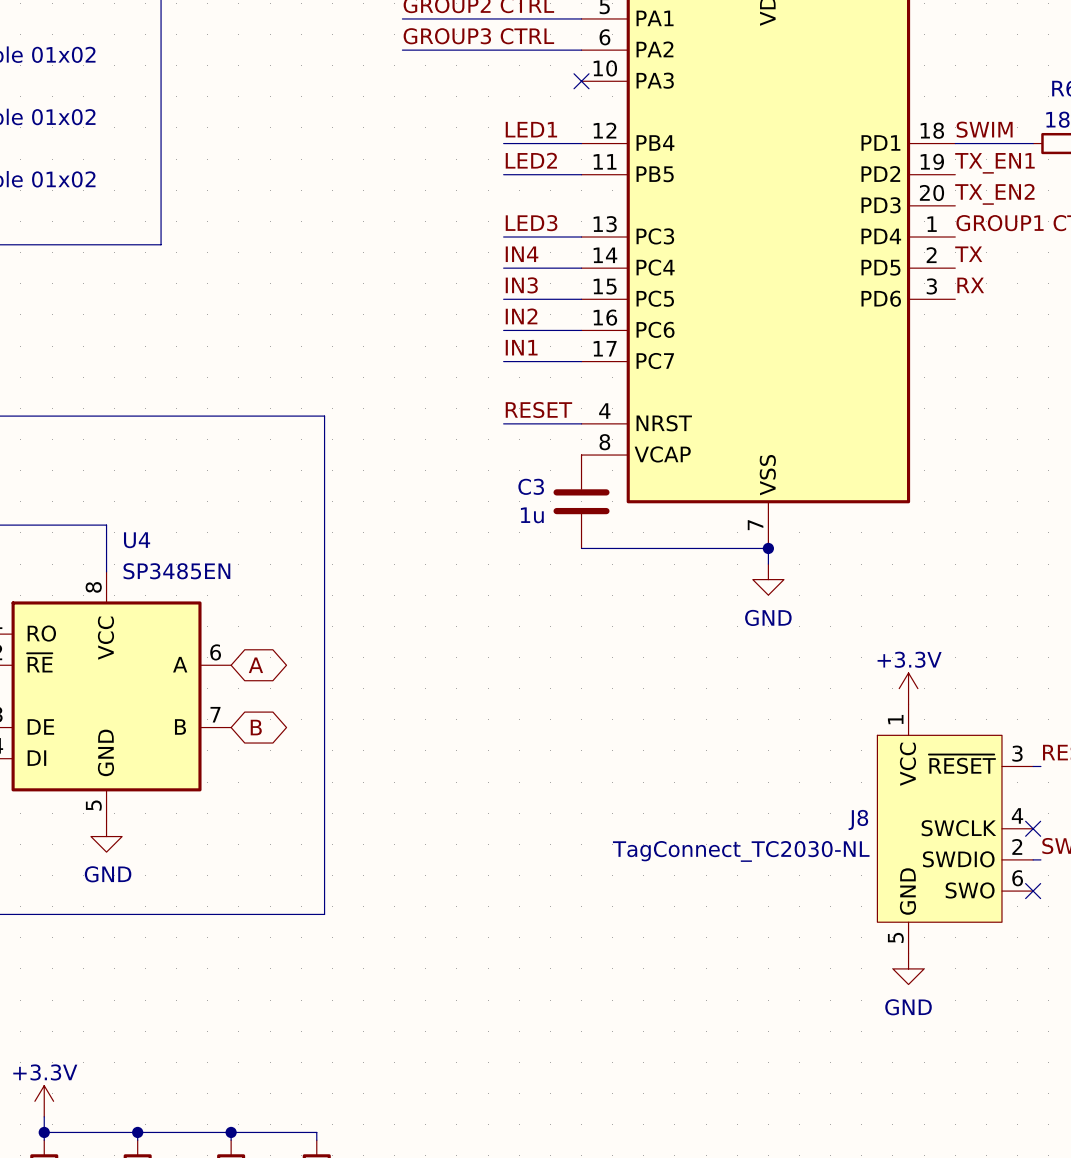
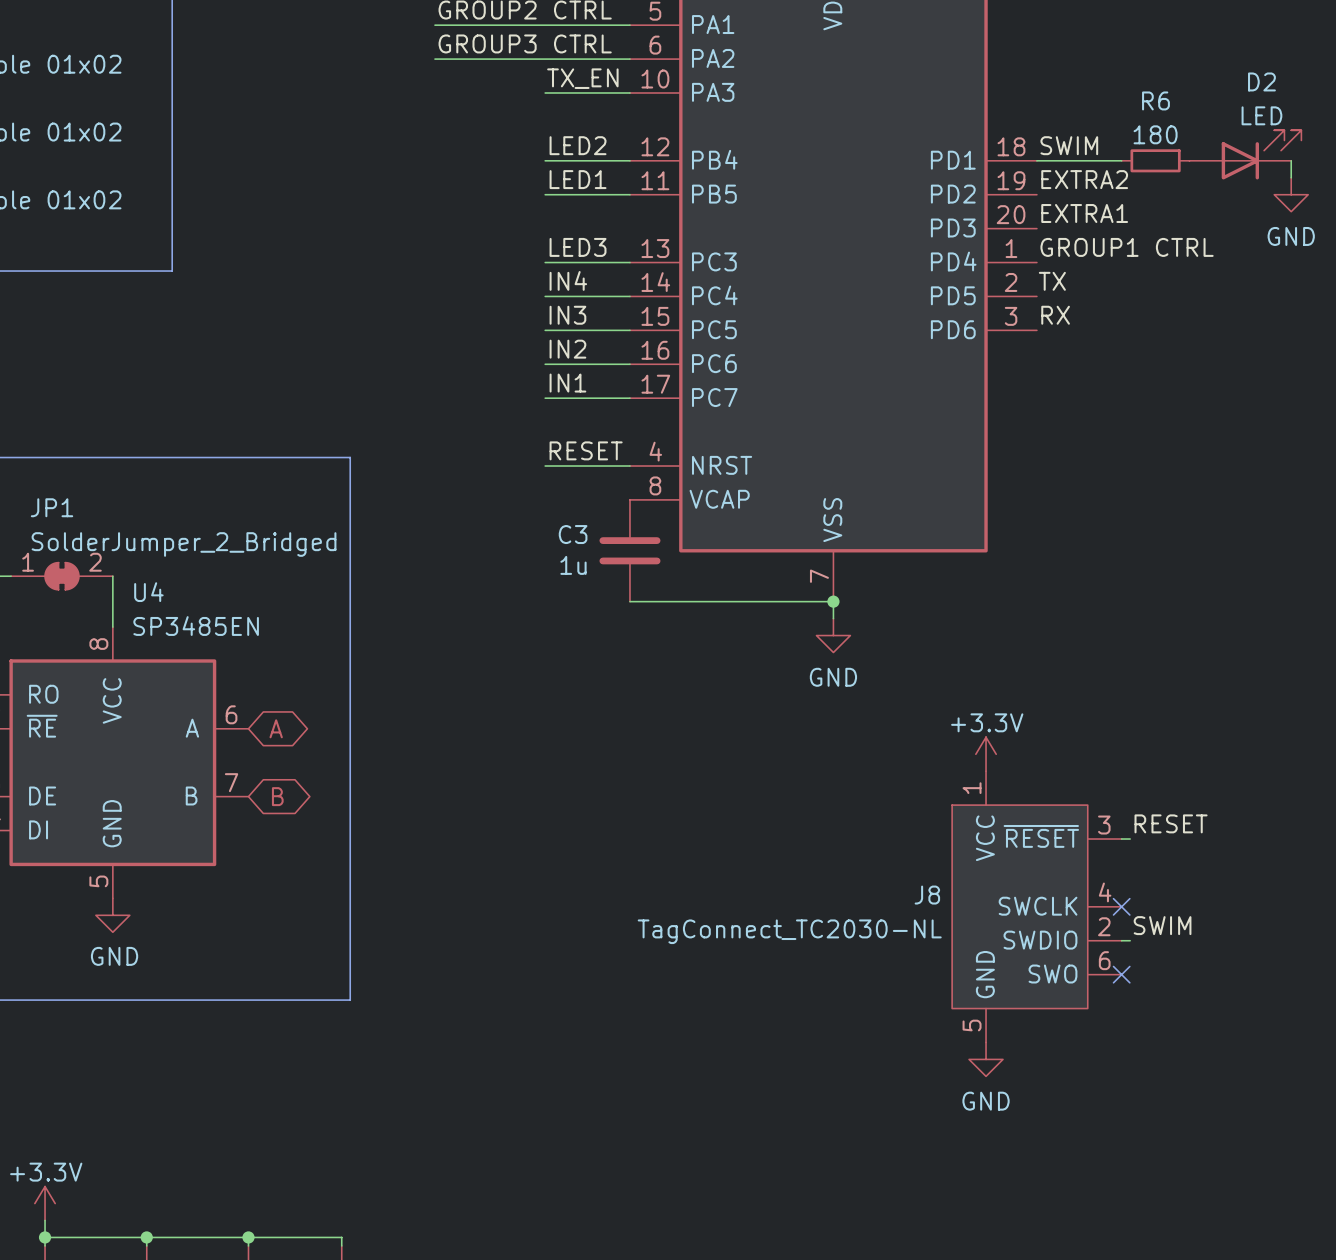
label: none -> TX_EN (582, 78)
wire: none -> (545, 92) (629, 92)
no-connect mark: (581, 81) -> none
label: LED1 (531, 129) -> LED2 (578, 145)
label: LED2 (531, 160) -> LED1 (578, 179)
label: TX_EN1 (994, 163) -> EXTRA2 (1084, 179)
label: TX_EN2 (994, 194) -> EXTRA1 (1084, 213)
JP1: none -> SolderJumper_2_Bridged (61, 576)

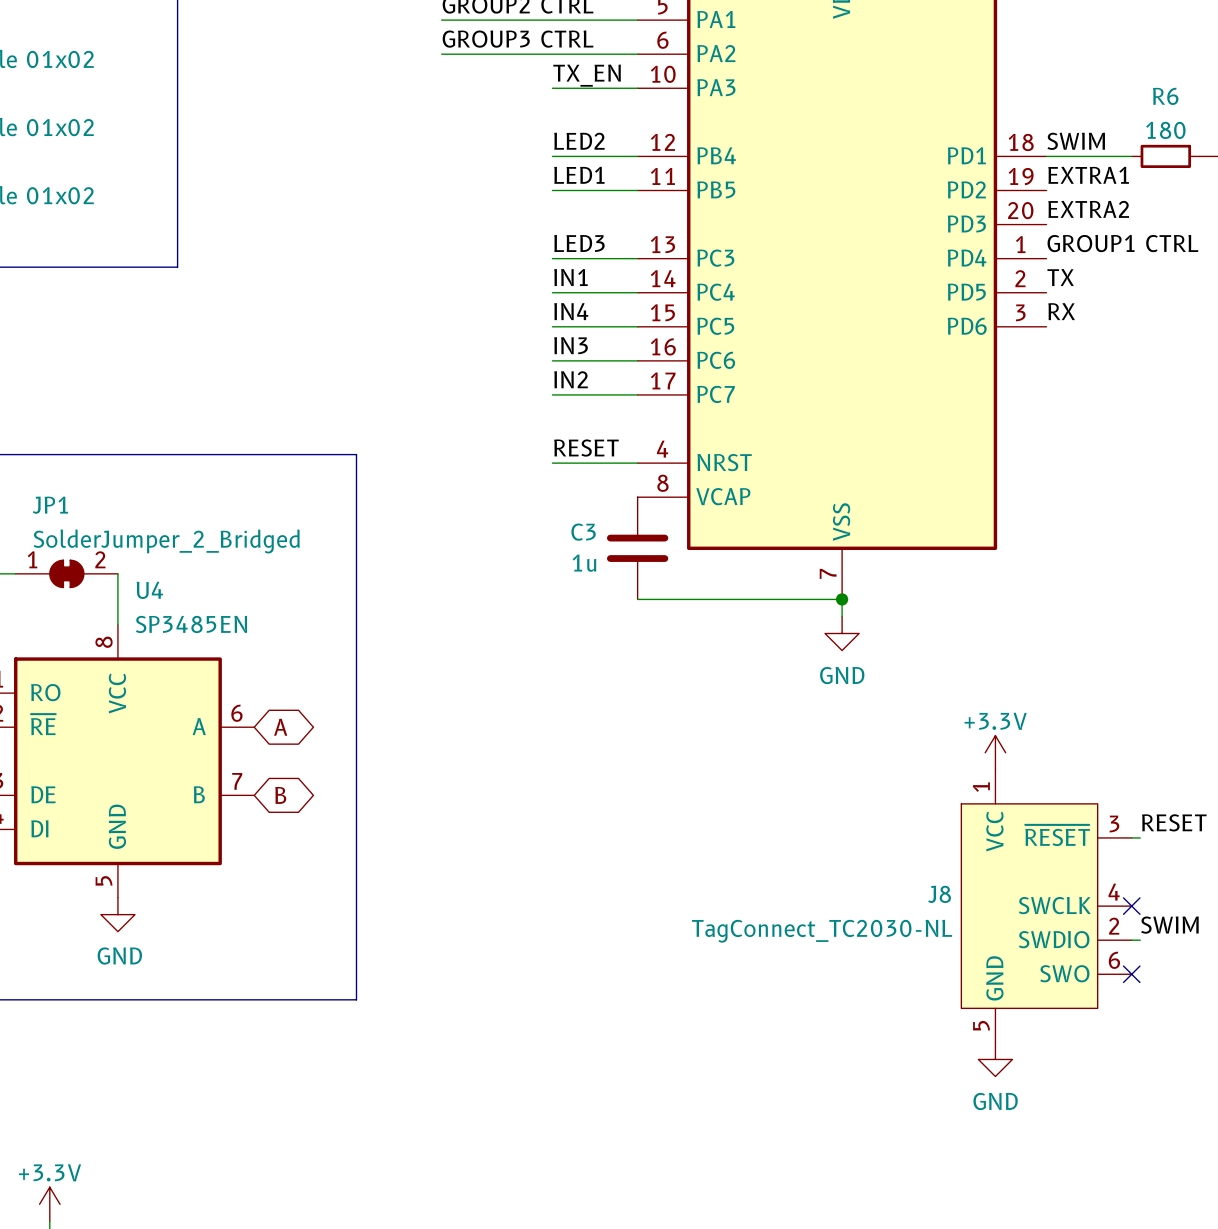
label: EXTRA2 (1084, 179) -> EXTRA1 (1088, 175)
label: EXTRA1 (1084, 213) -> EXTRA2 (1088, 209)
label: IN4 (568, 280) -> IN1 (570, 277)
label: IN3 (567, 315) -> IN4 (571, 311)
label: IN2 (567, 349) -> IN3 (571, 345)
label: IN1 (567, 383) -> IN2 (571, 379)

